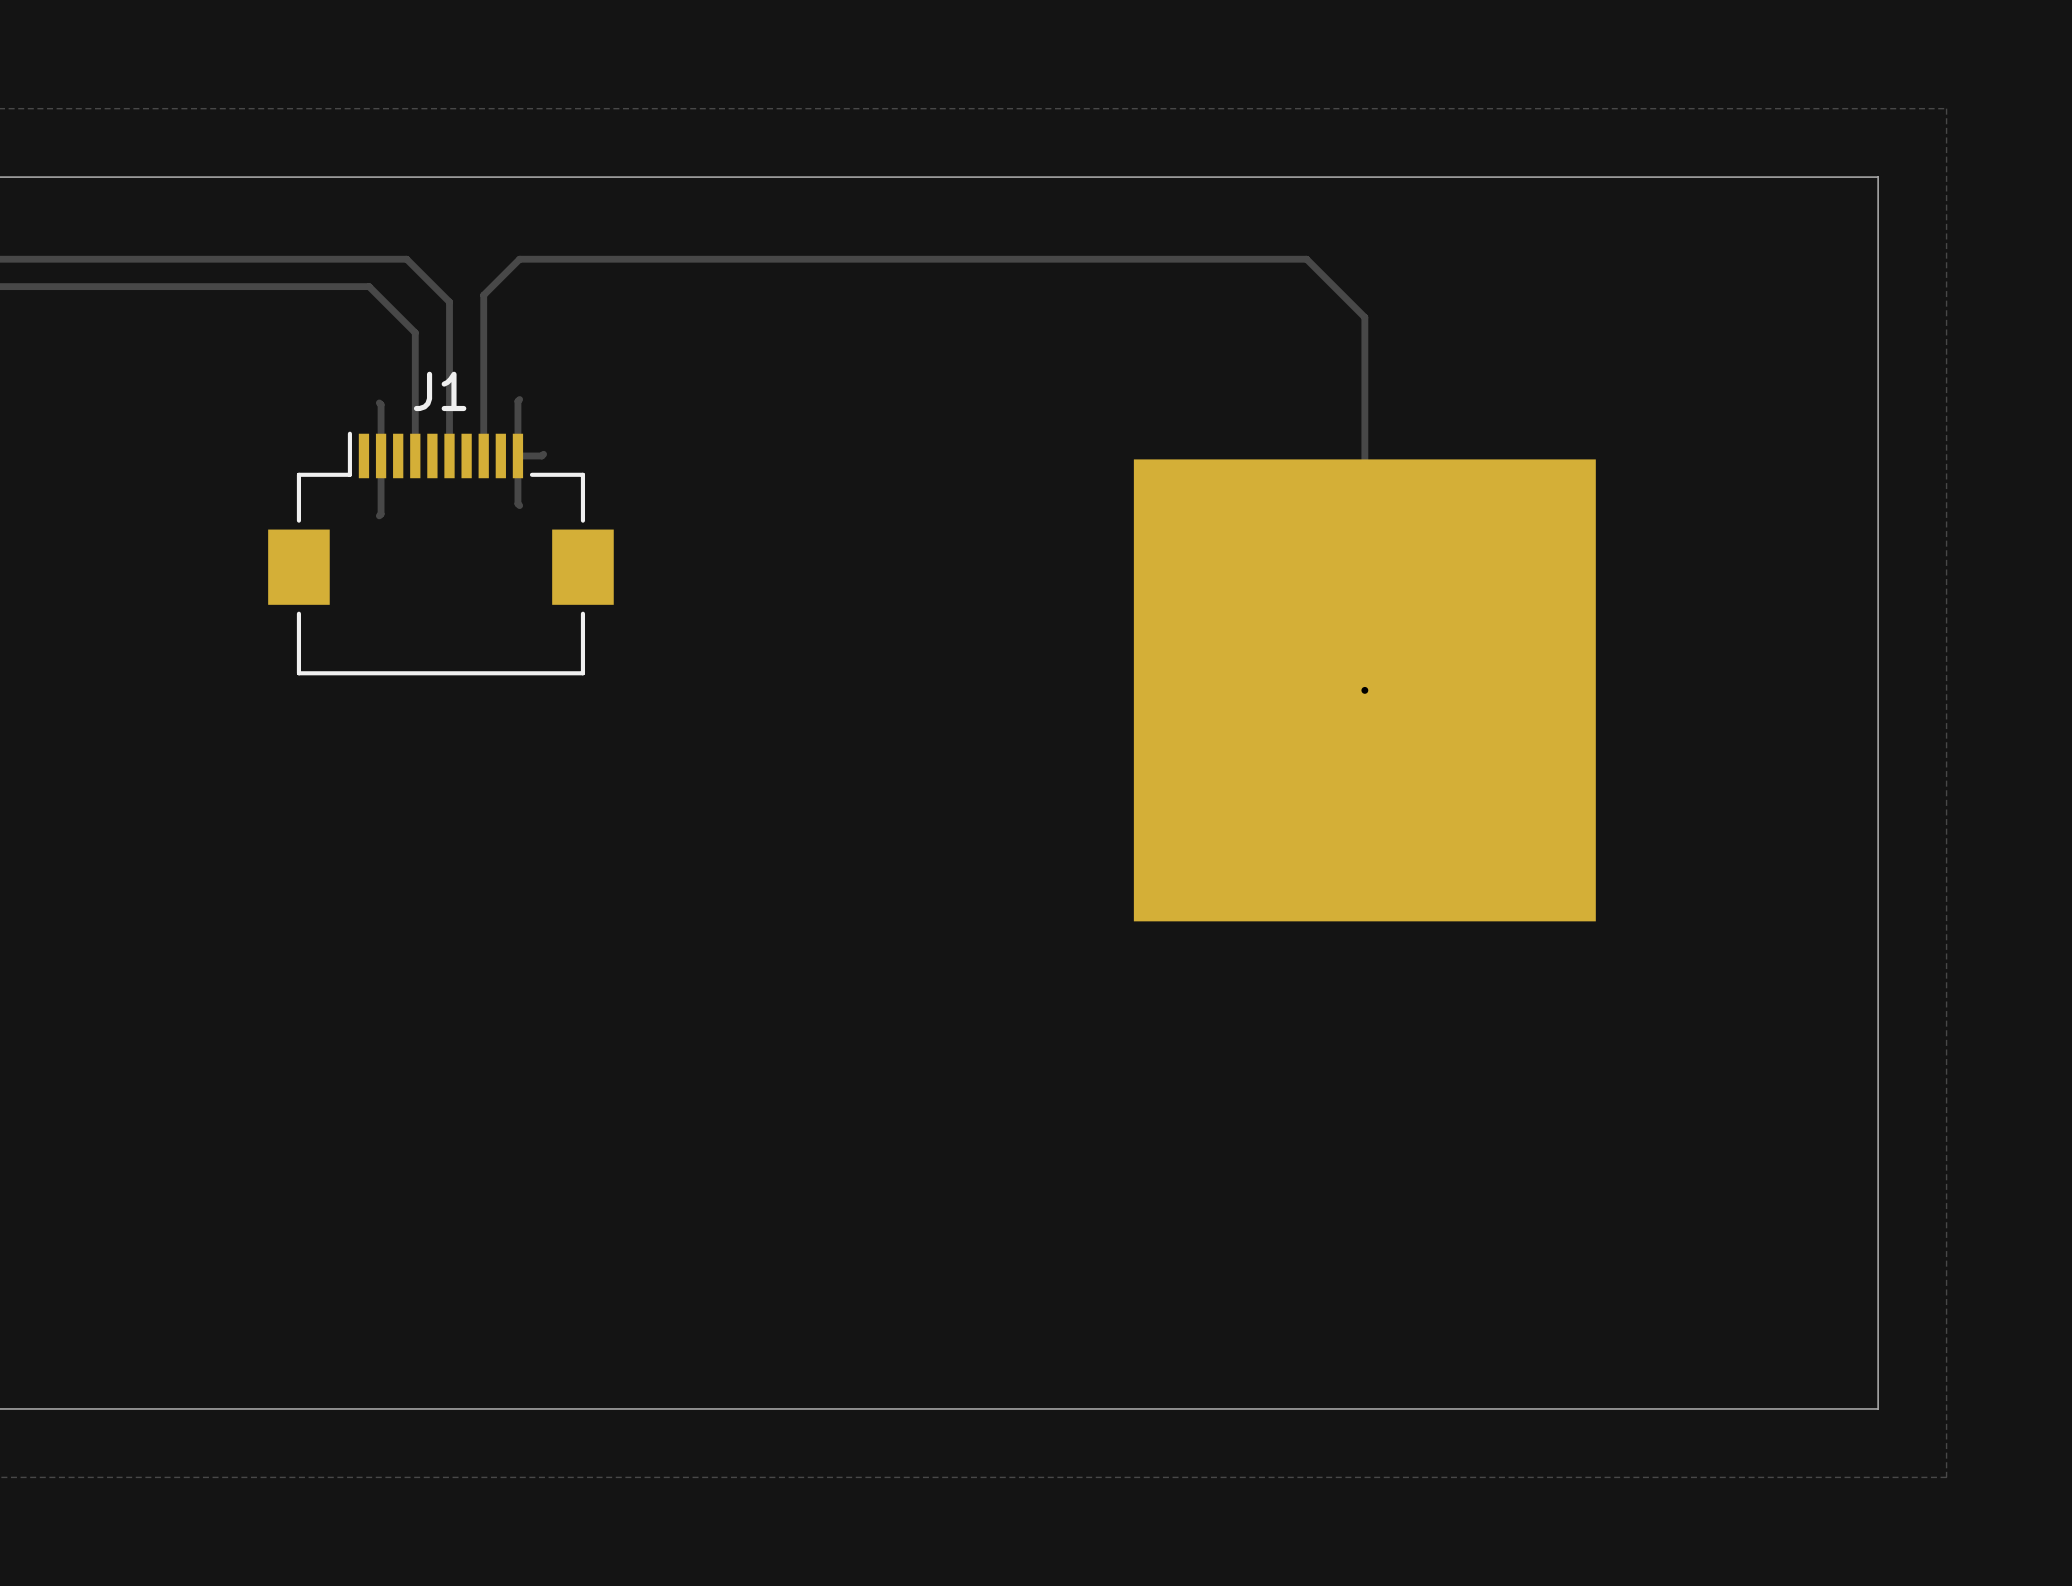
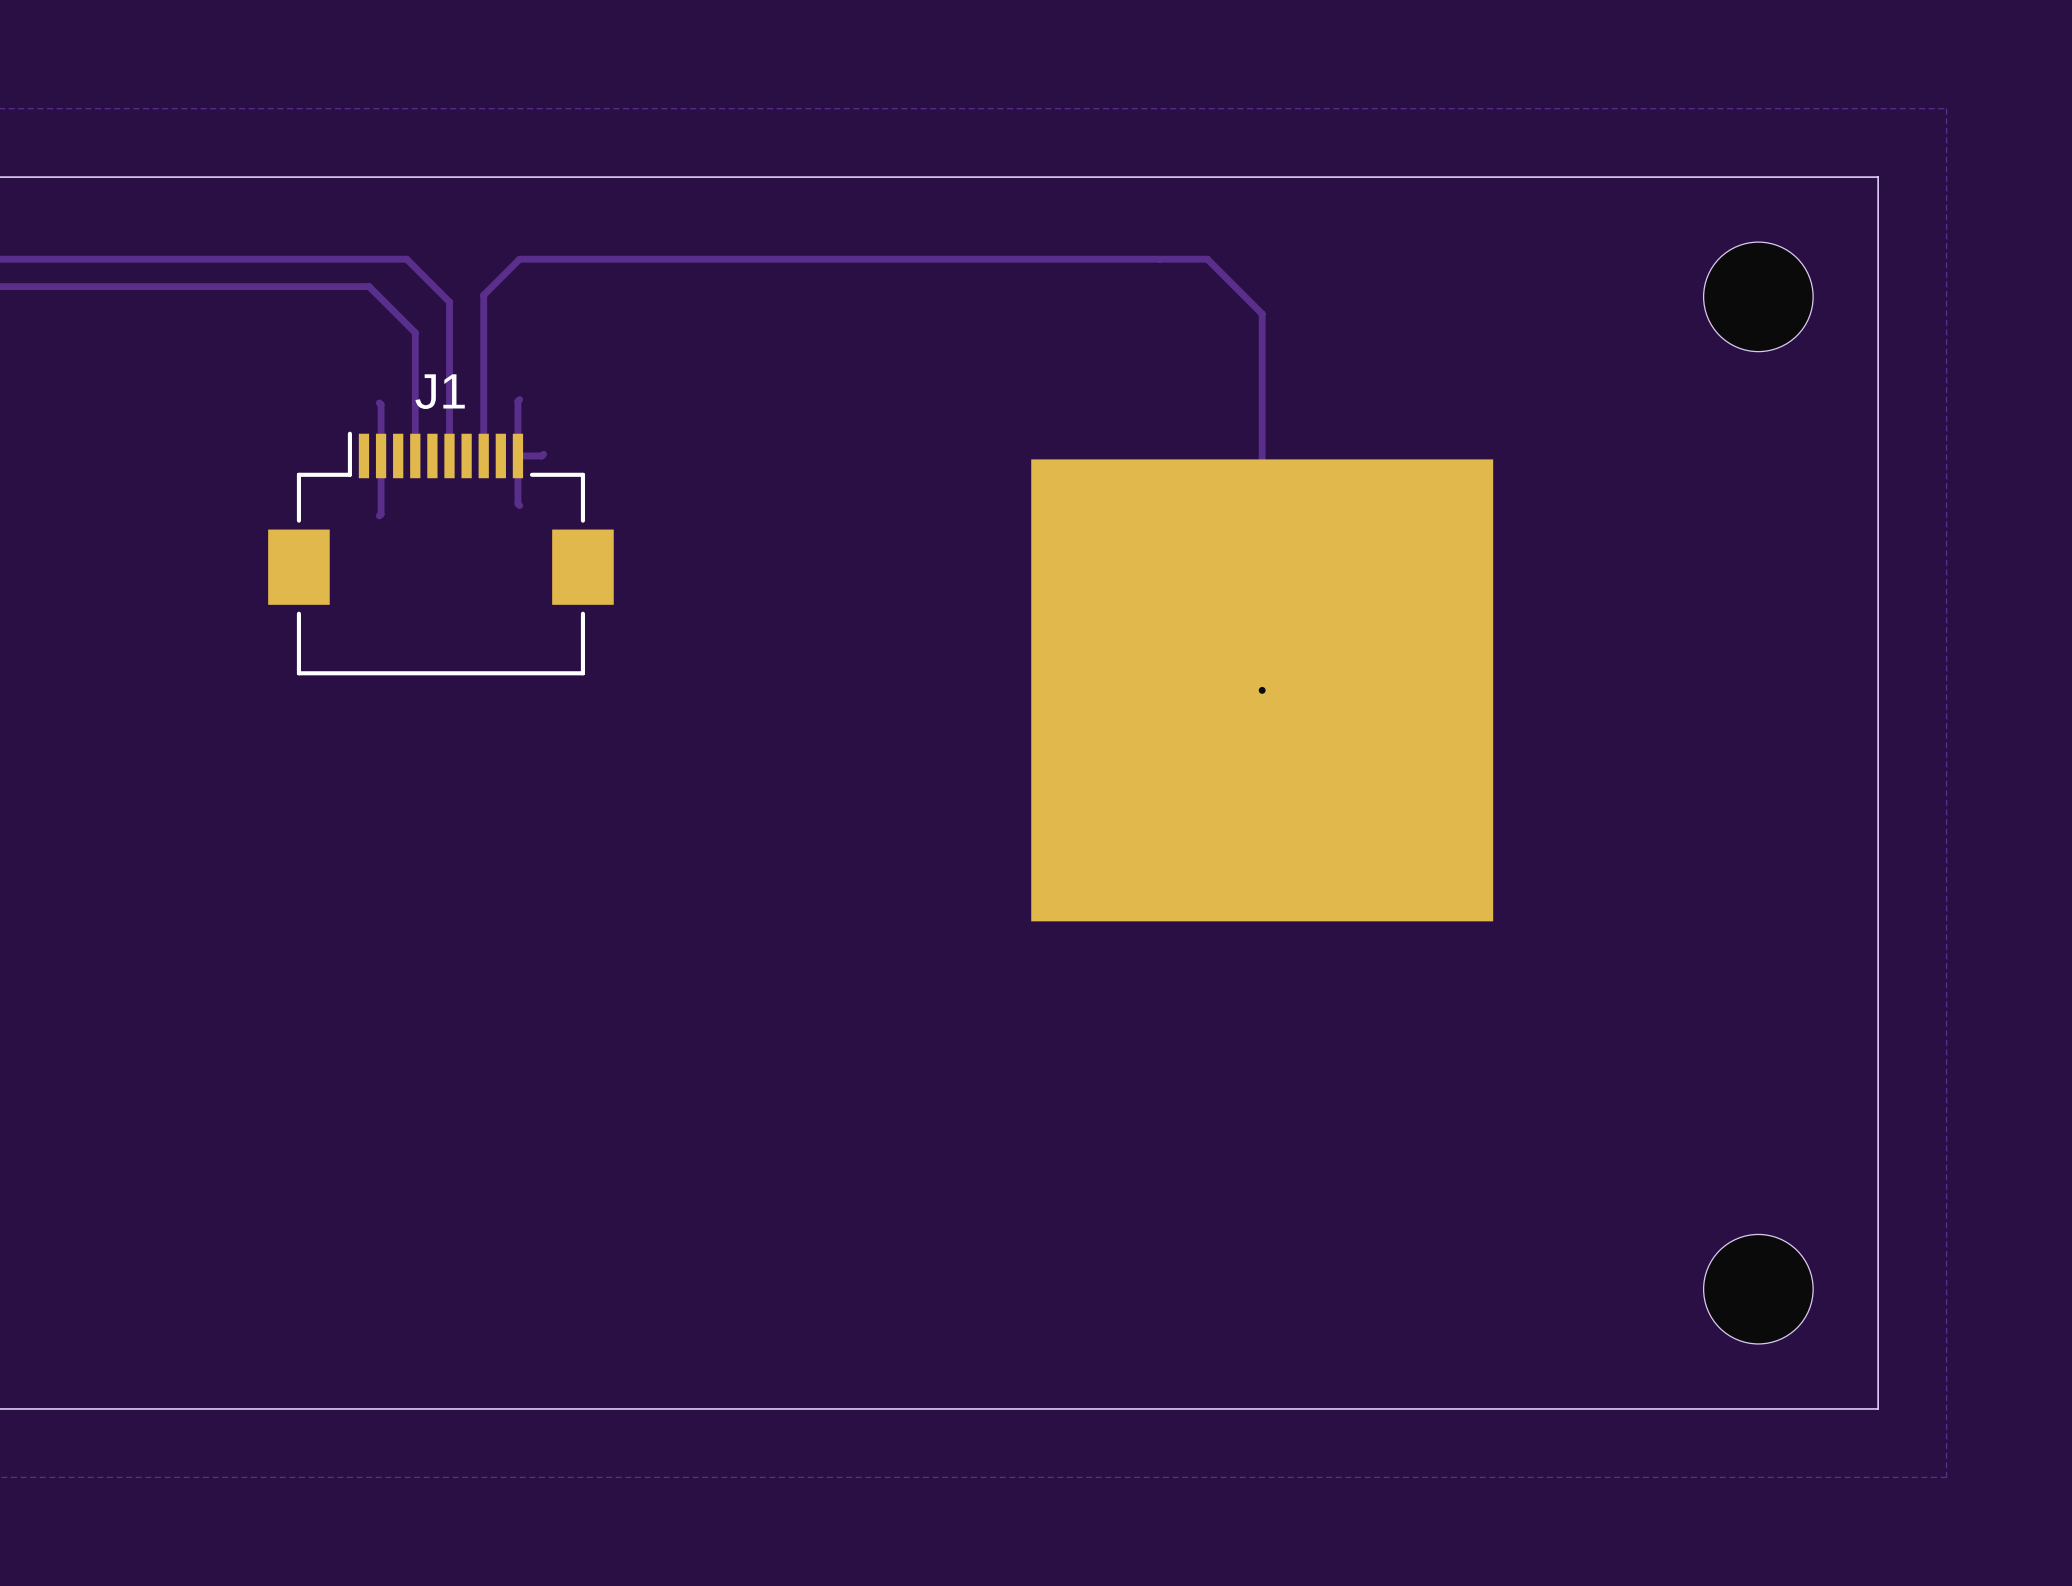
track: (1207, 259) (1306, 259) (1364, 317) (1364, 671) -> (1207, 259) (1262, 313) (1262, 671)
part: none -> (1758, 296)
part position: (1364, 690) -> (1262, 690)
part: none -> (1758, 1289)

